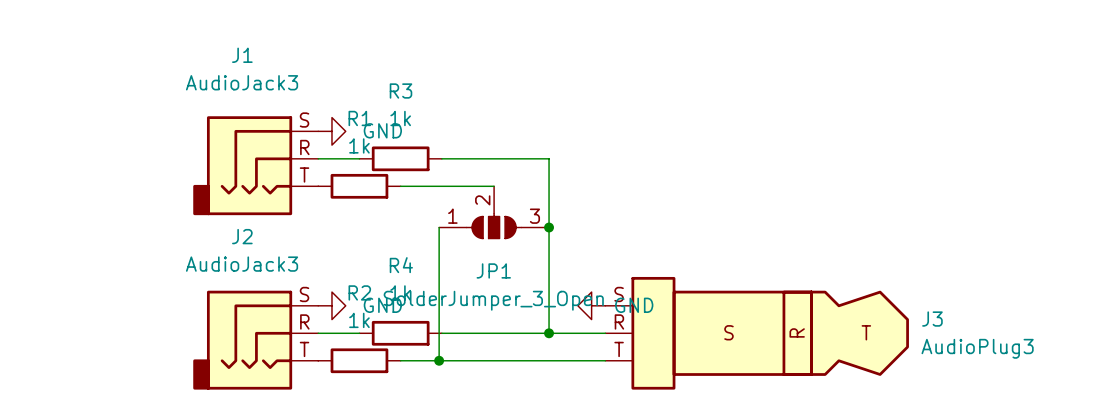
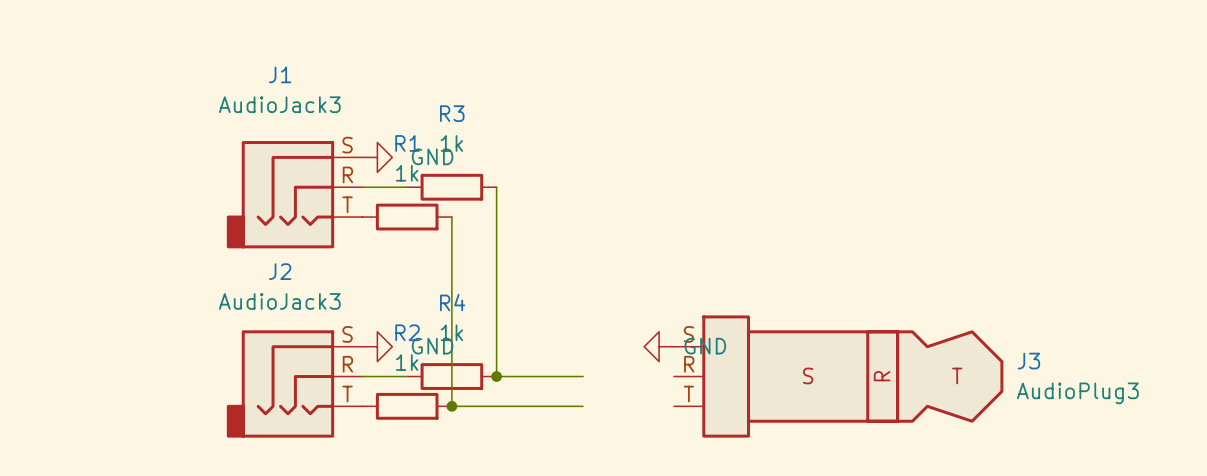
wire: (441, 158) (549, 158) (549, 333) -> (496, 187) (496, 376)
wire: (400, 186) (494, 186) -> (451, 217) (451, 406)
JP1: SolderJumper_3_Open (494, 212) -> none
wire: (439, 227) (439, 360) -> none
junction: (549, 227) -> none
junction: none -> (496, 376)
wire: (521, 333) (605, 333) -> none
junction: (549, 333) -> none
junction: none -> (451, 406)
junction: (439, 360) -> none
wire: (521, 360) (605, 360) -> none

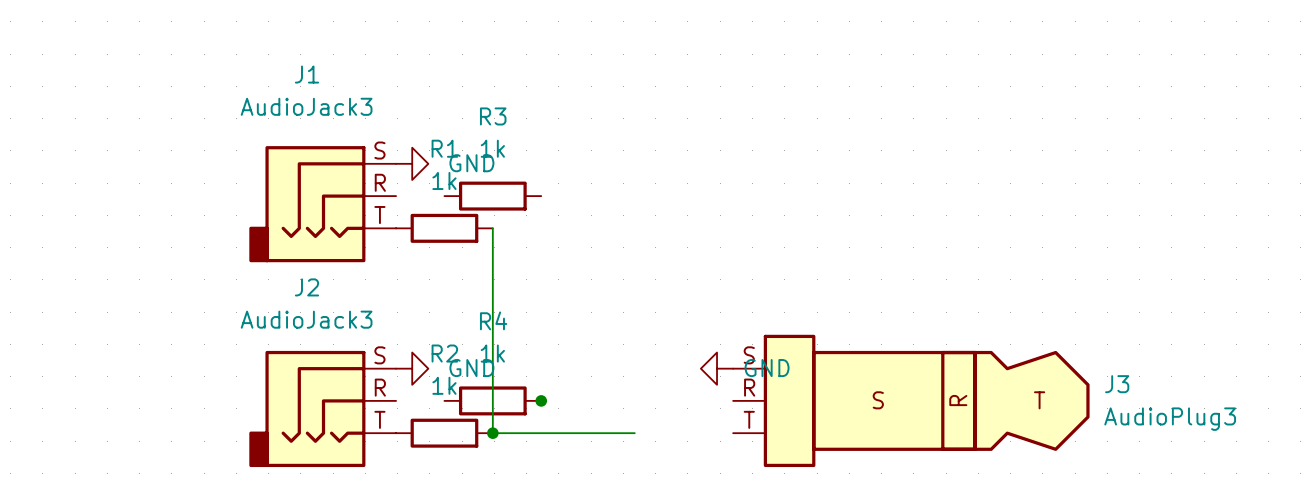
wire: (362, 187) (407, 187) -> none
wire: (496, 187) (496, 376) (583, 376) -> none
wire: (362, 376) (407, 376) -> none

